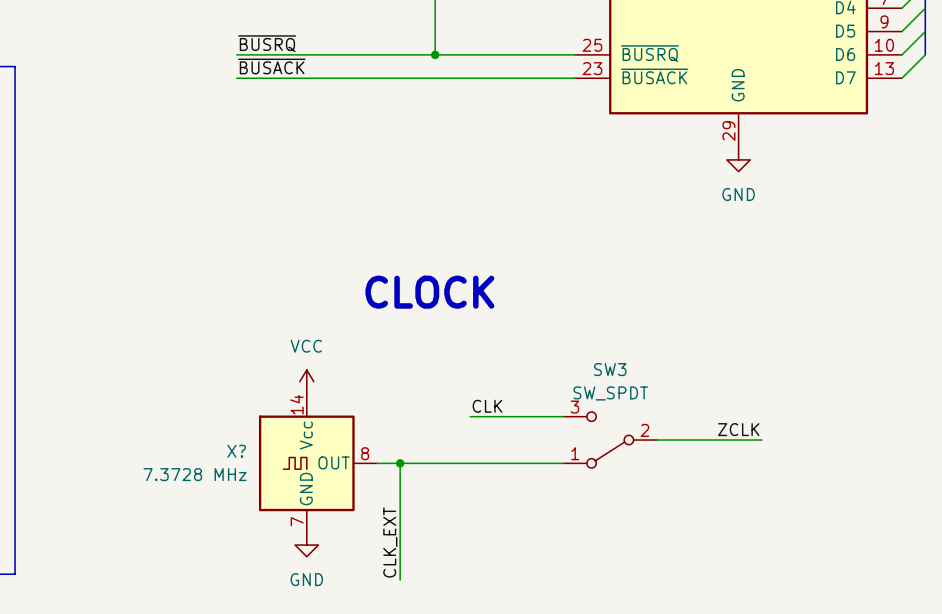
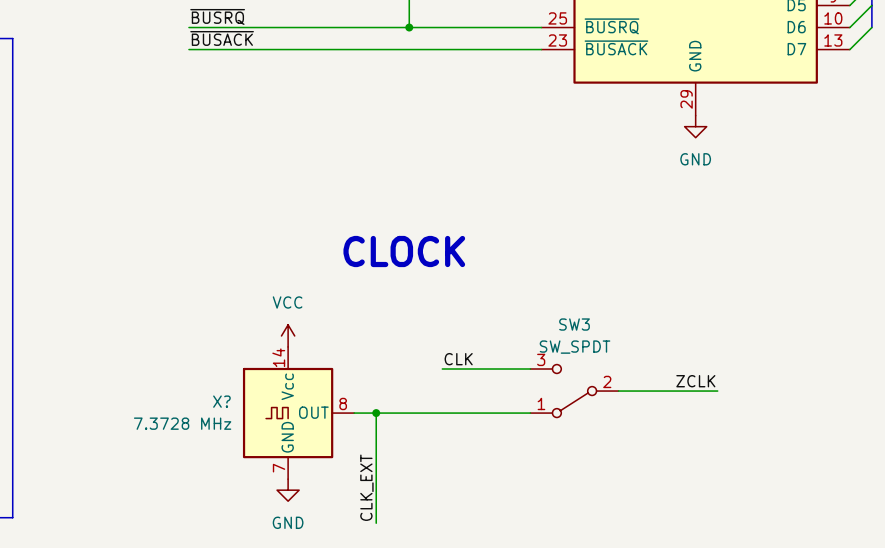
label position: ~{BUSRQ} (267, 43) -> ~{BUSRQ} (217, 16)
wire: none -> (188, 27) (222, 27)
label position: ~{BUSACK} (271, 66) -> ~{BUSACK} (222, 38)
wire: none -> (188, 49) (222, 49)

